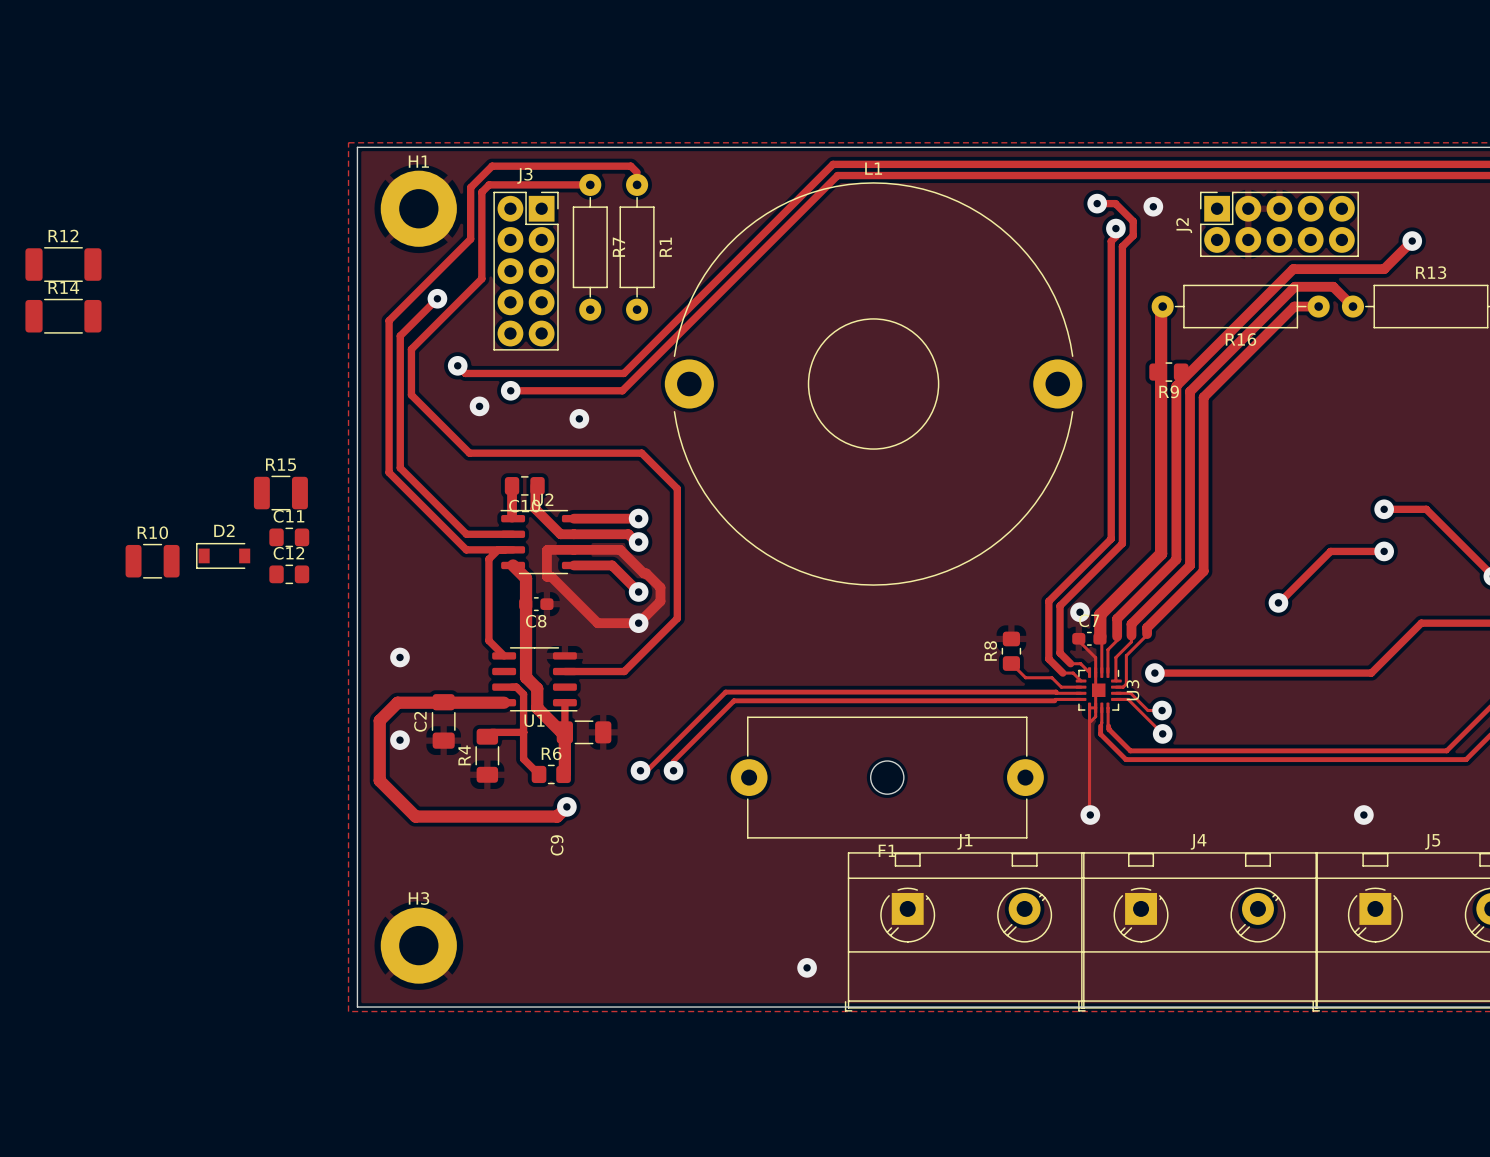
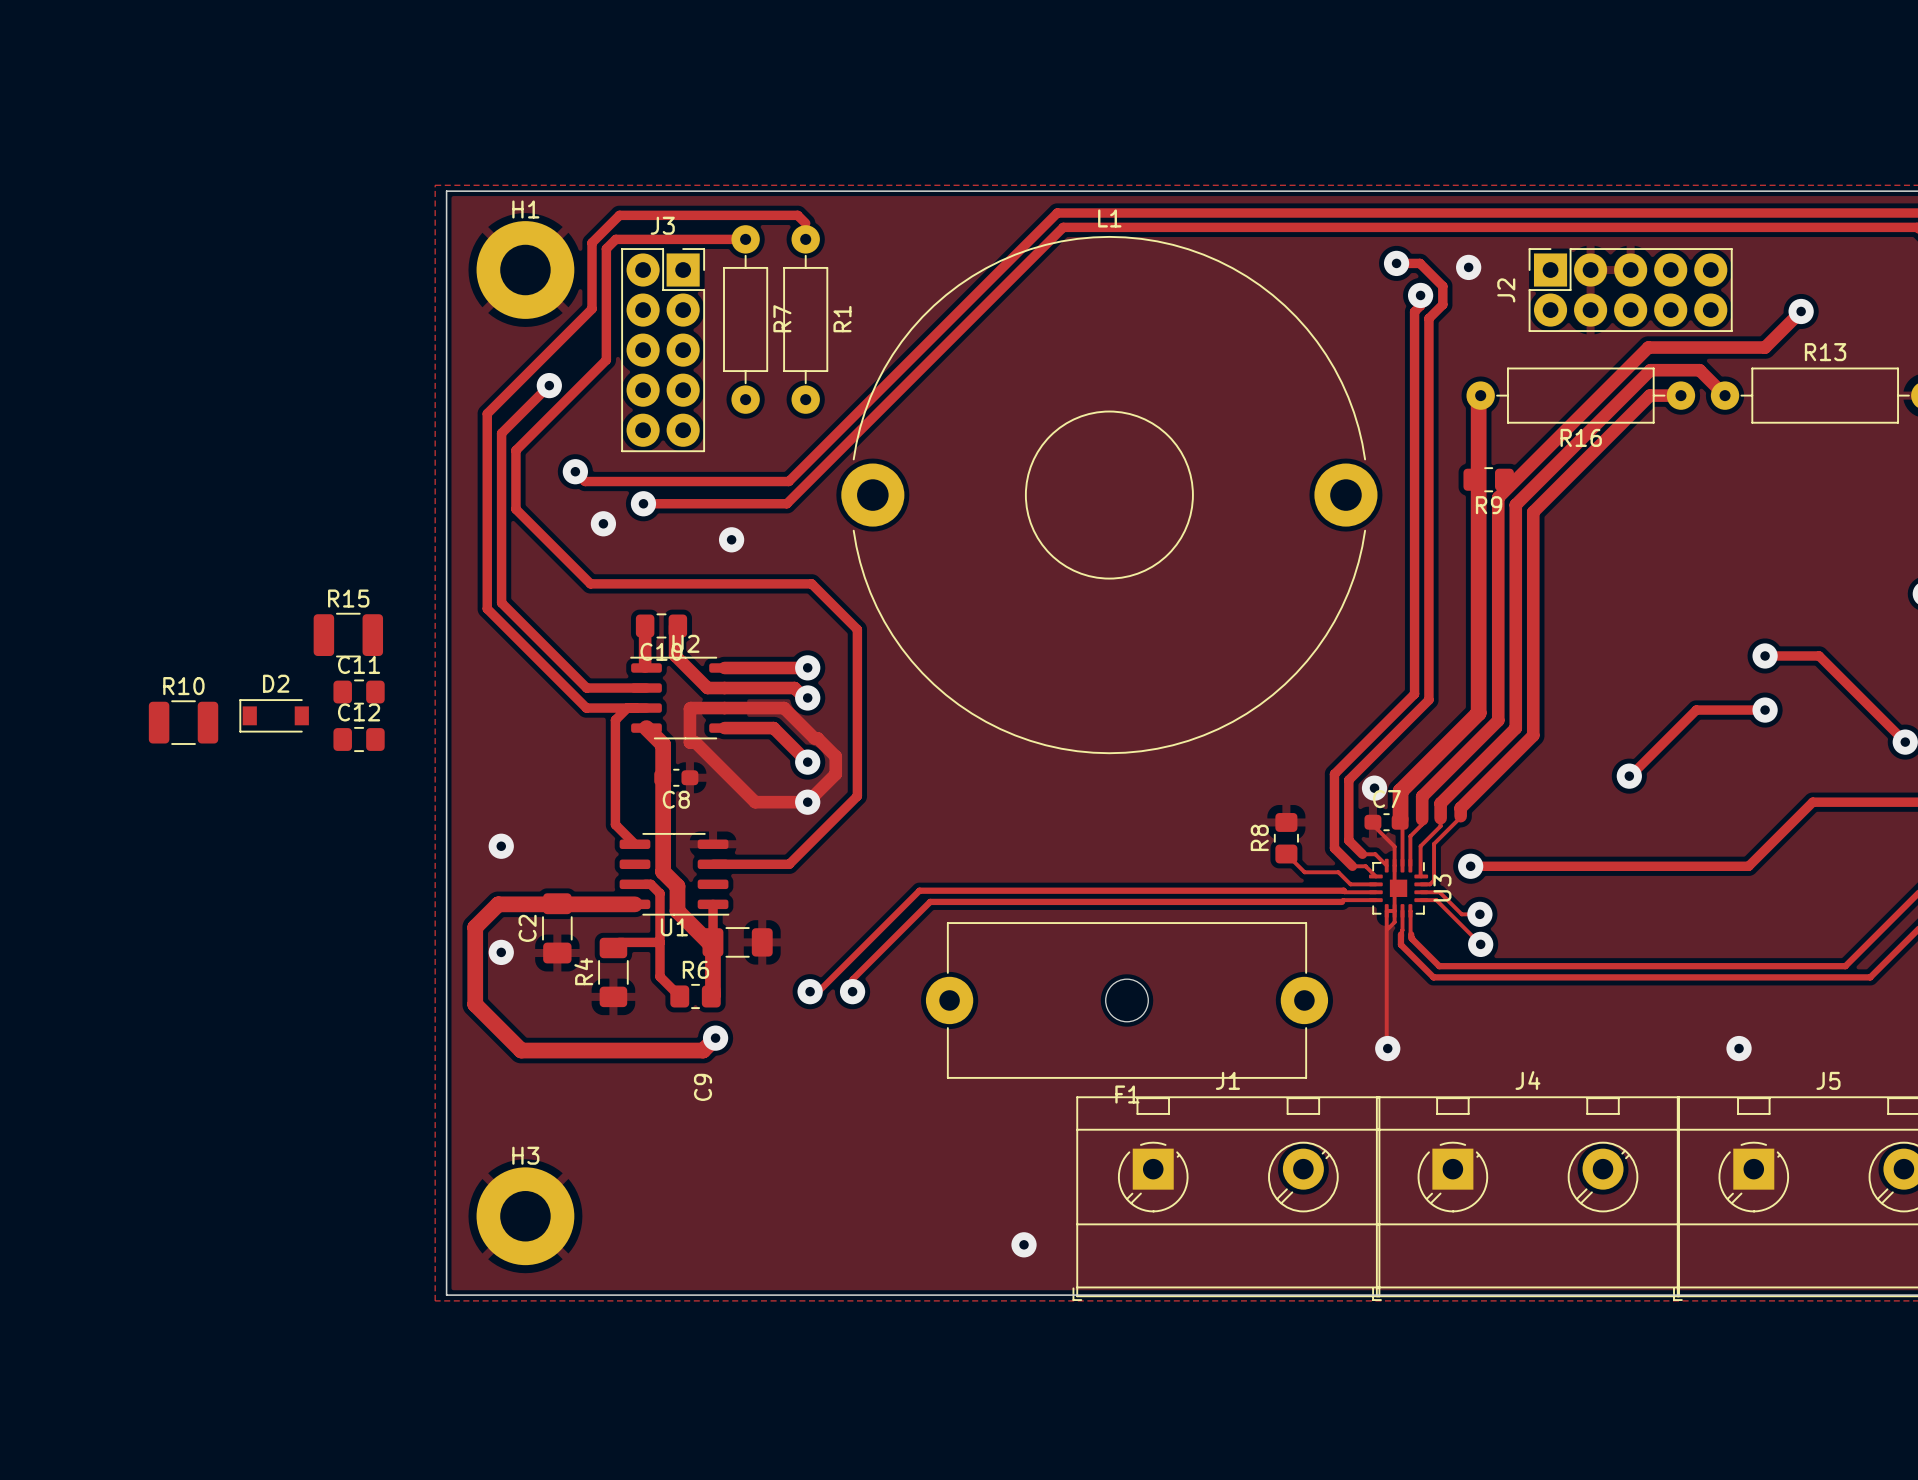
R12: (63, 264) -> none
R14: (63, 316) -> none

